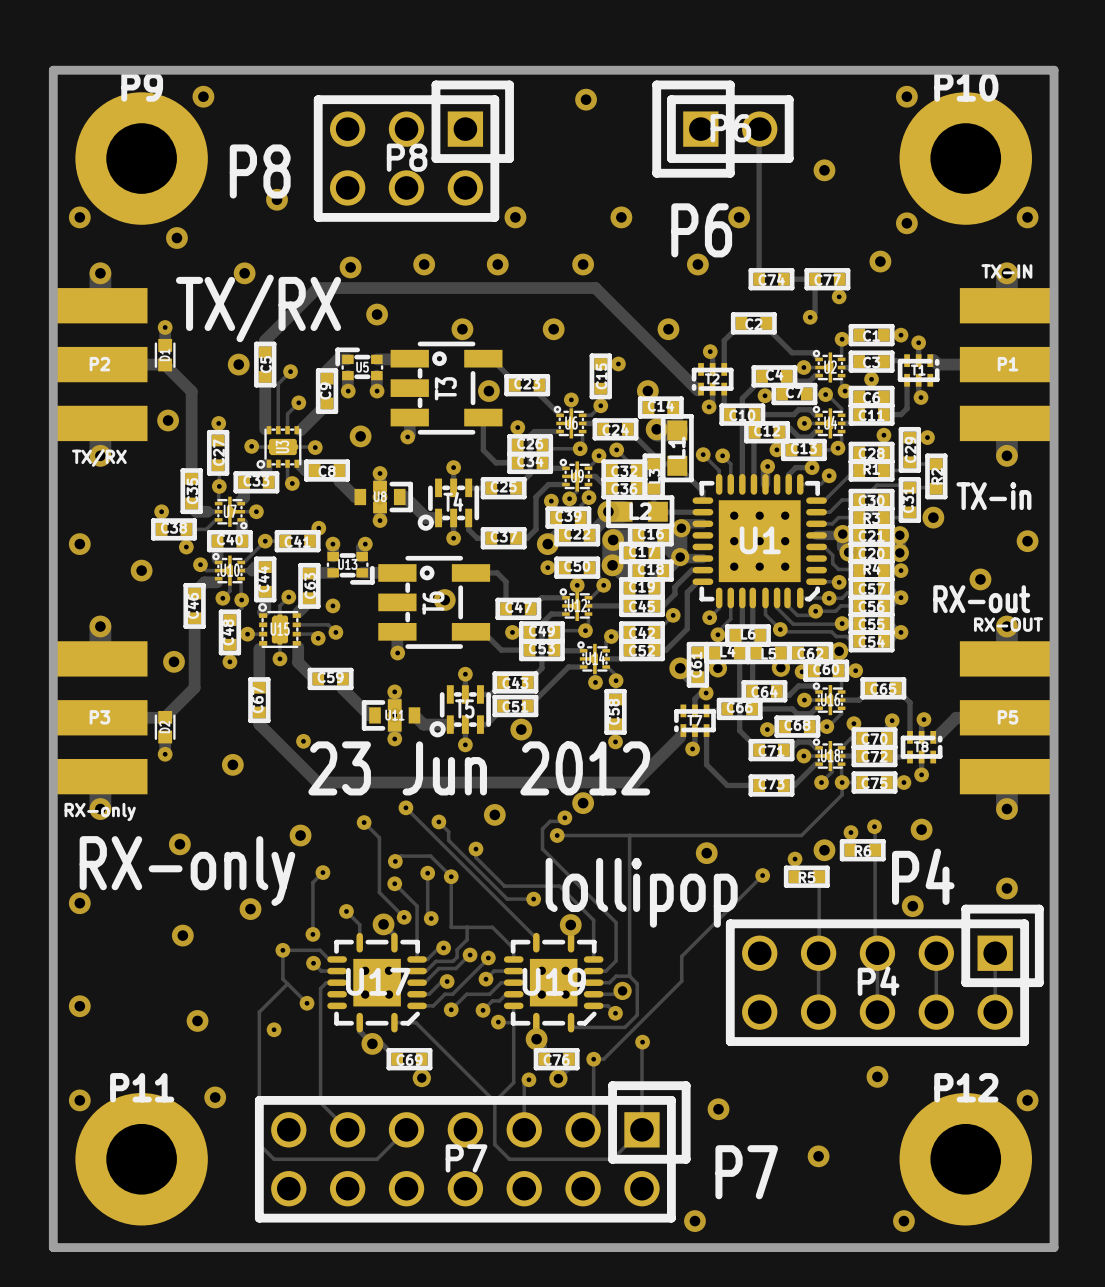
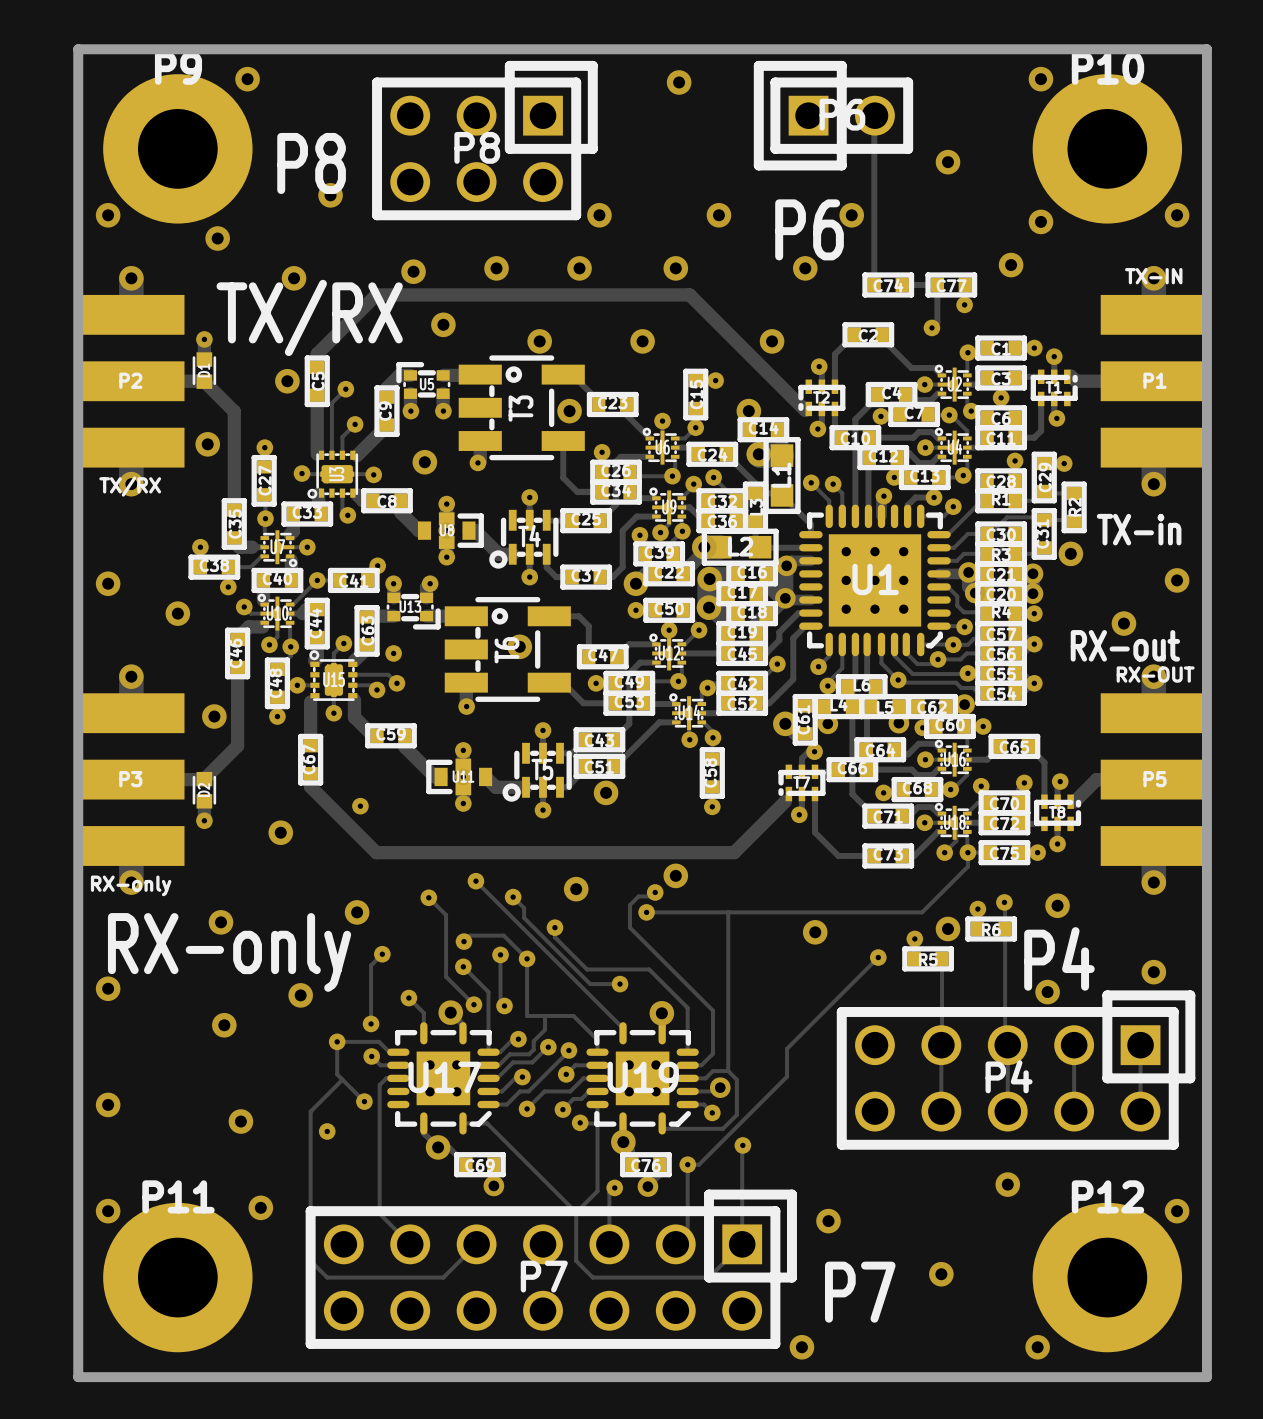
text: 23 Jun 2012 (479, 768) -> none
text: lollipop (641, 892) -> none

